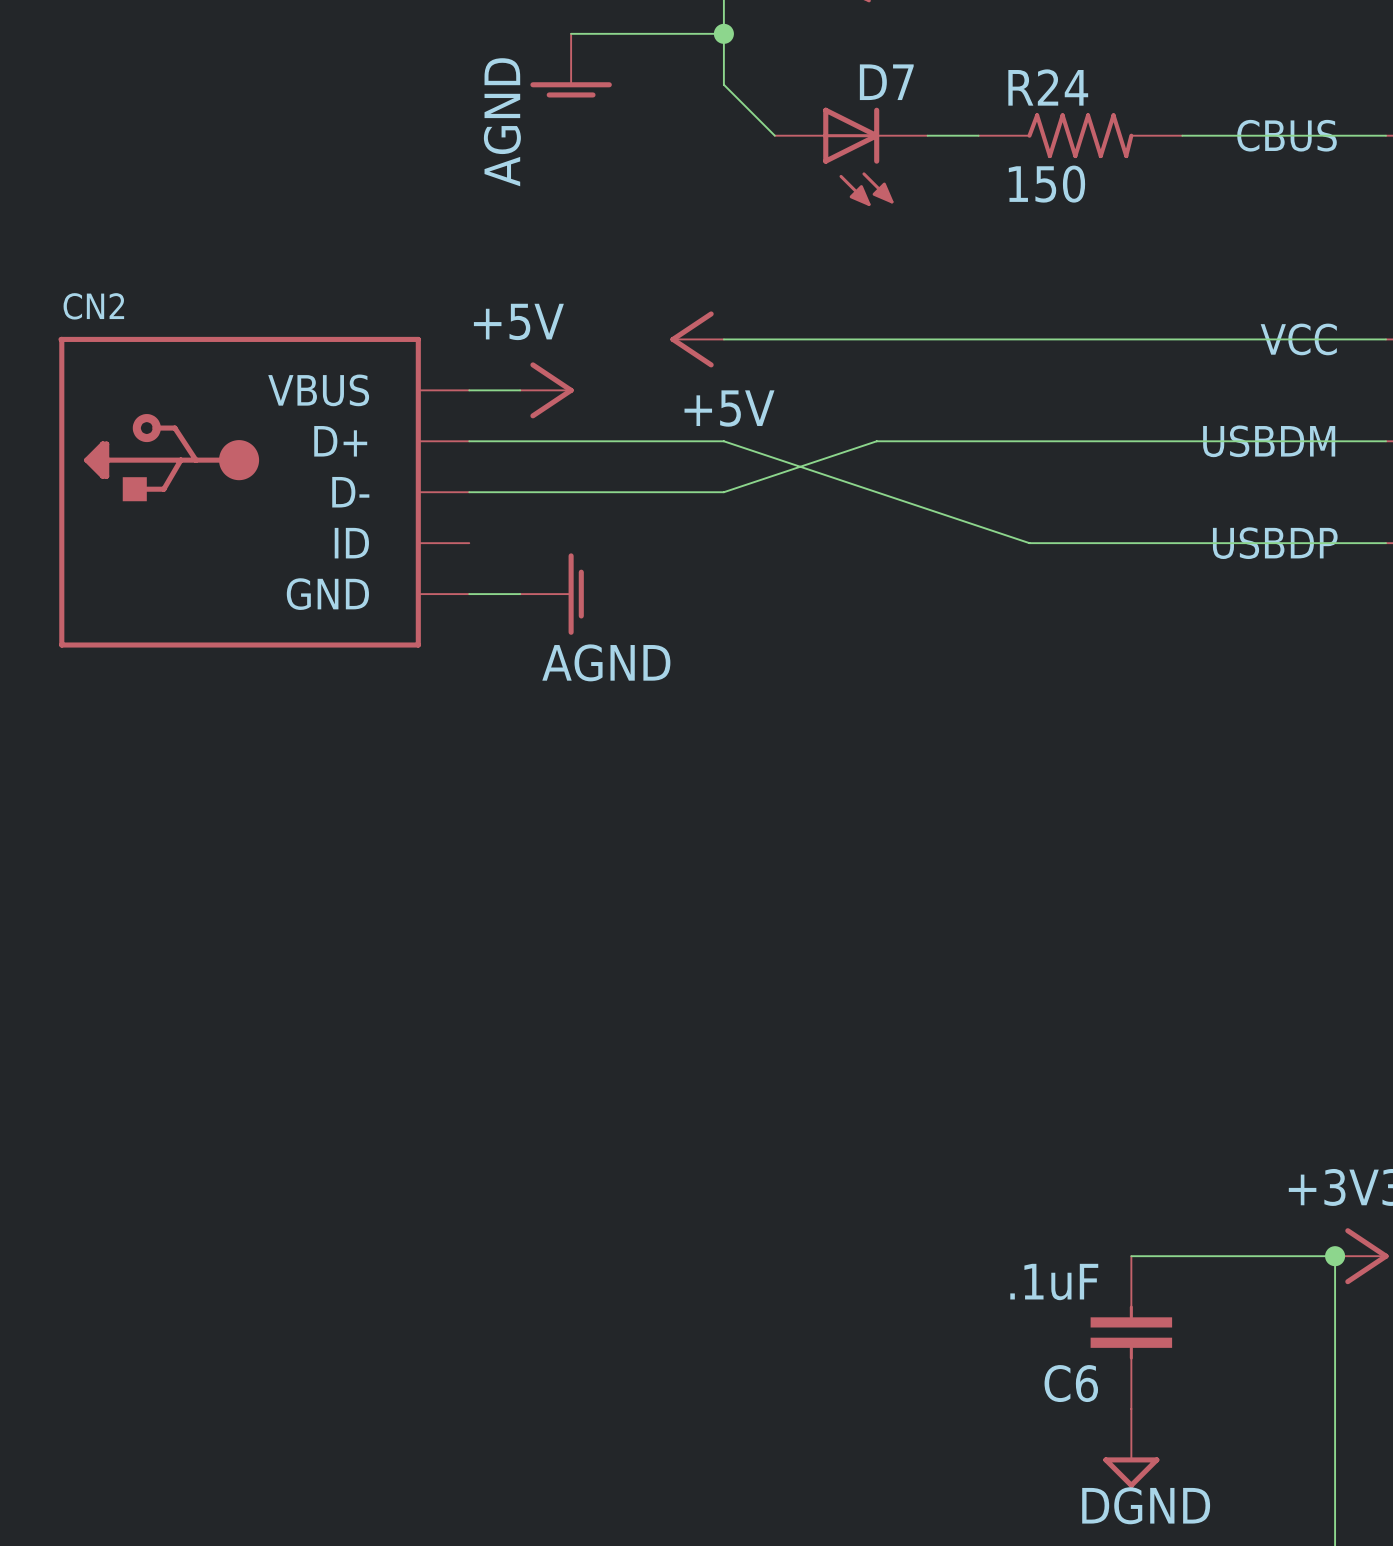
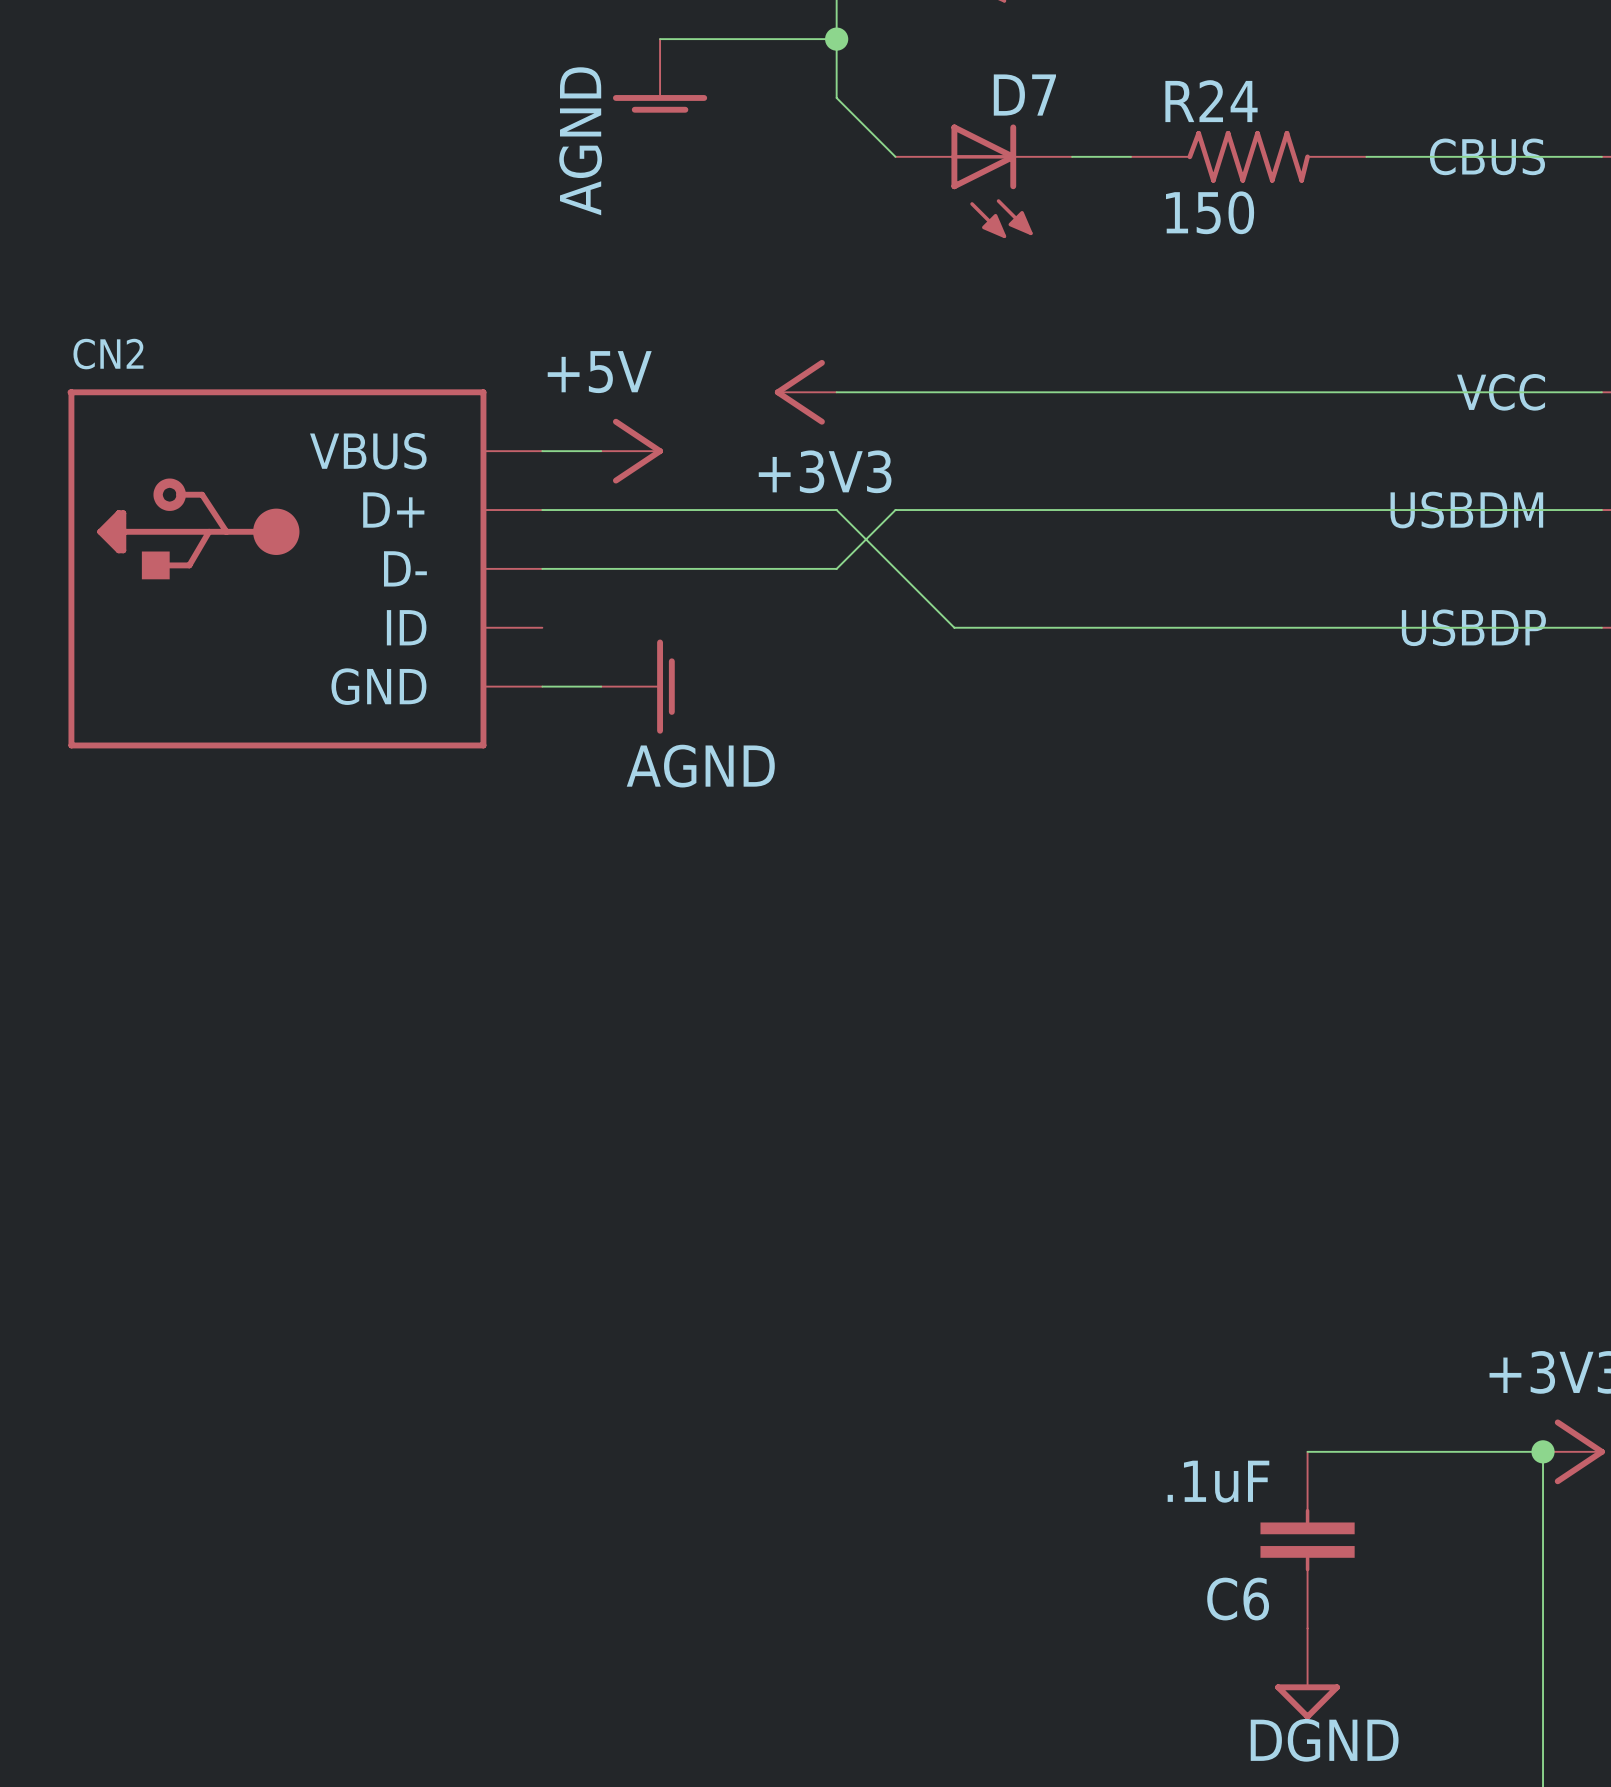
power symbol: +5V (697, 339) -> +3V3 (805, 392)
wire: (723, 441) (1029, 543) -> (836, 510) (954, 627) (1189, 627)
wire: (876, 441) (723, 492) -> (1013, 510) (895, 510) (836, 568)

